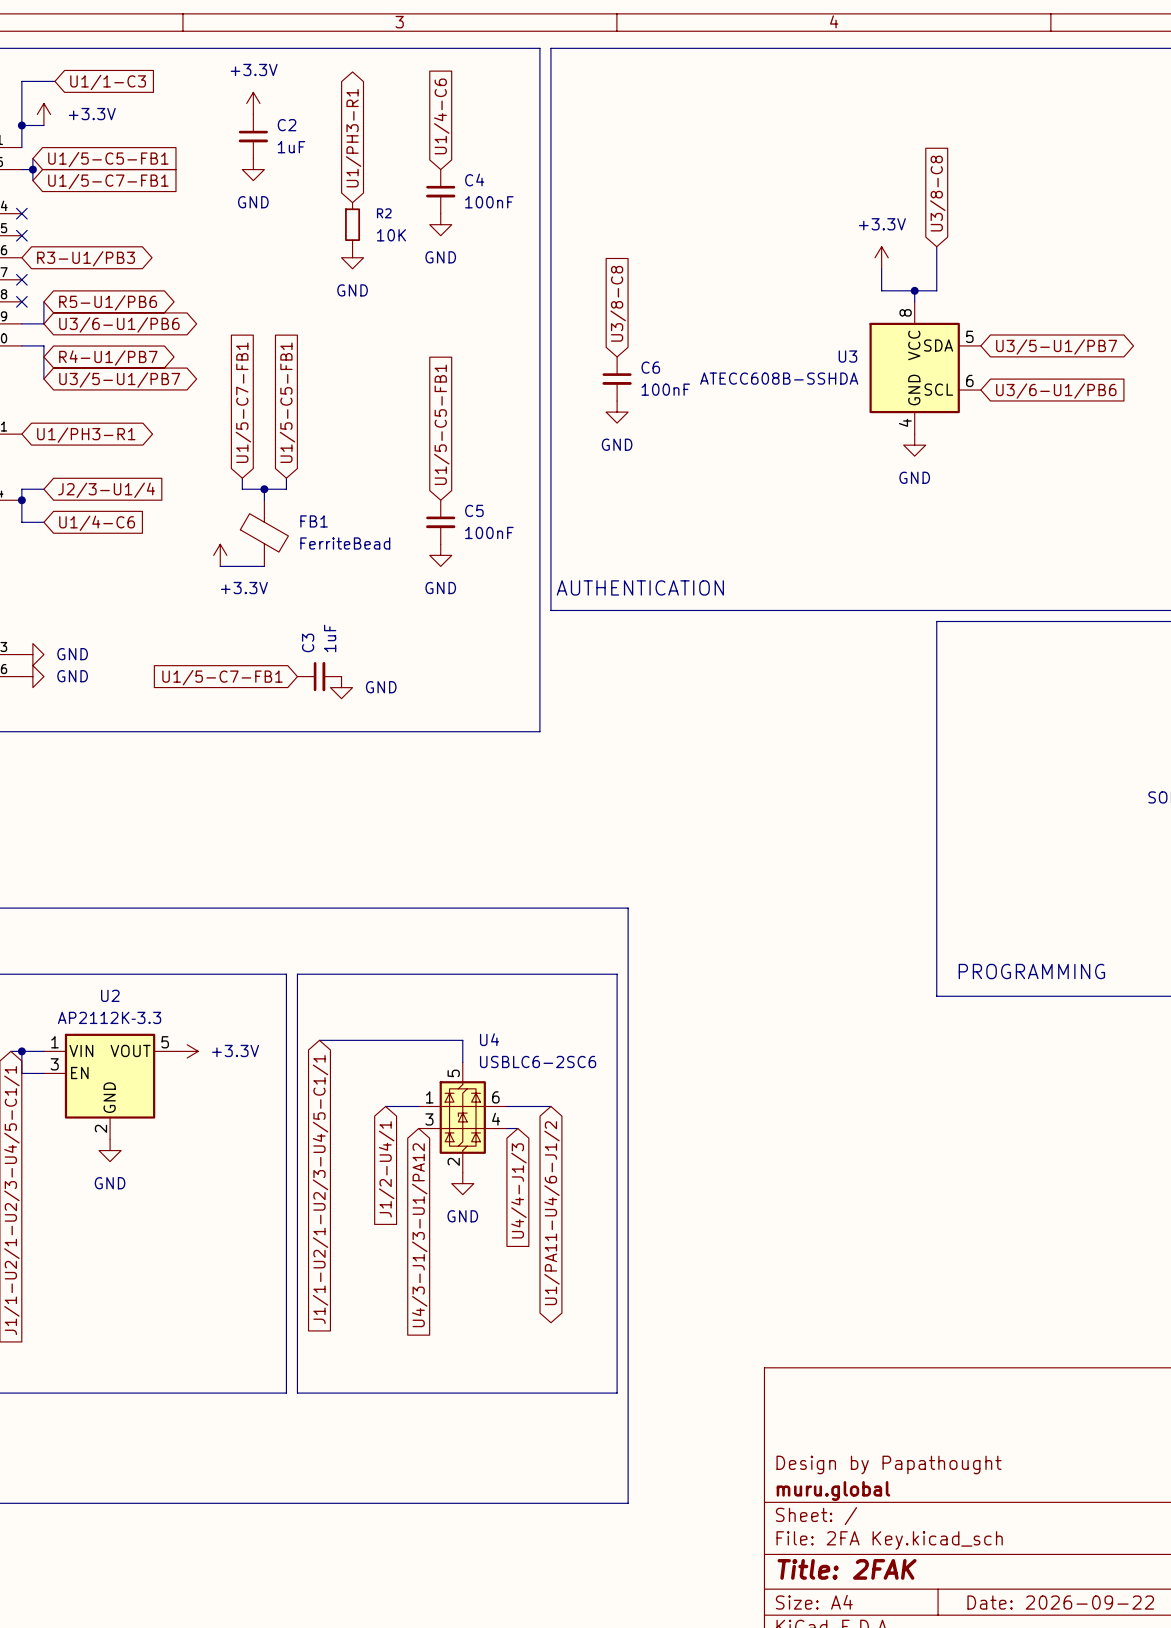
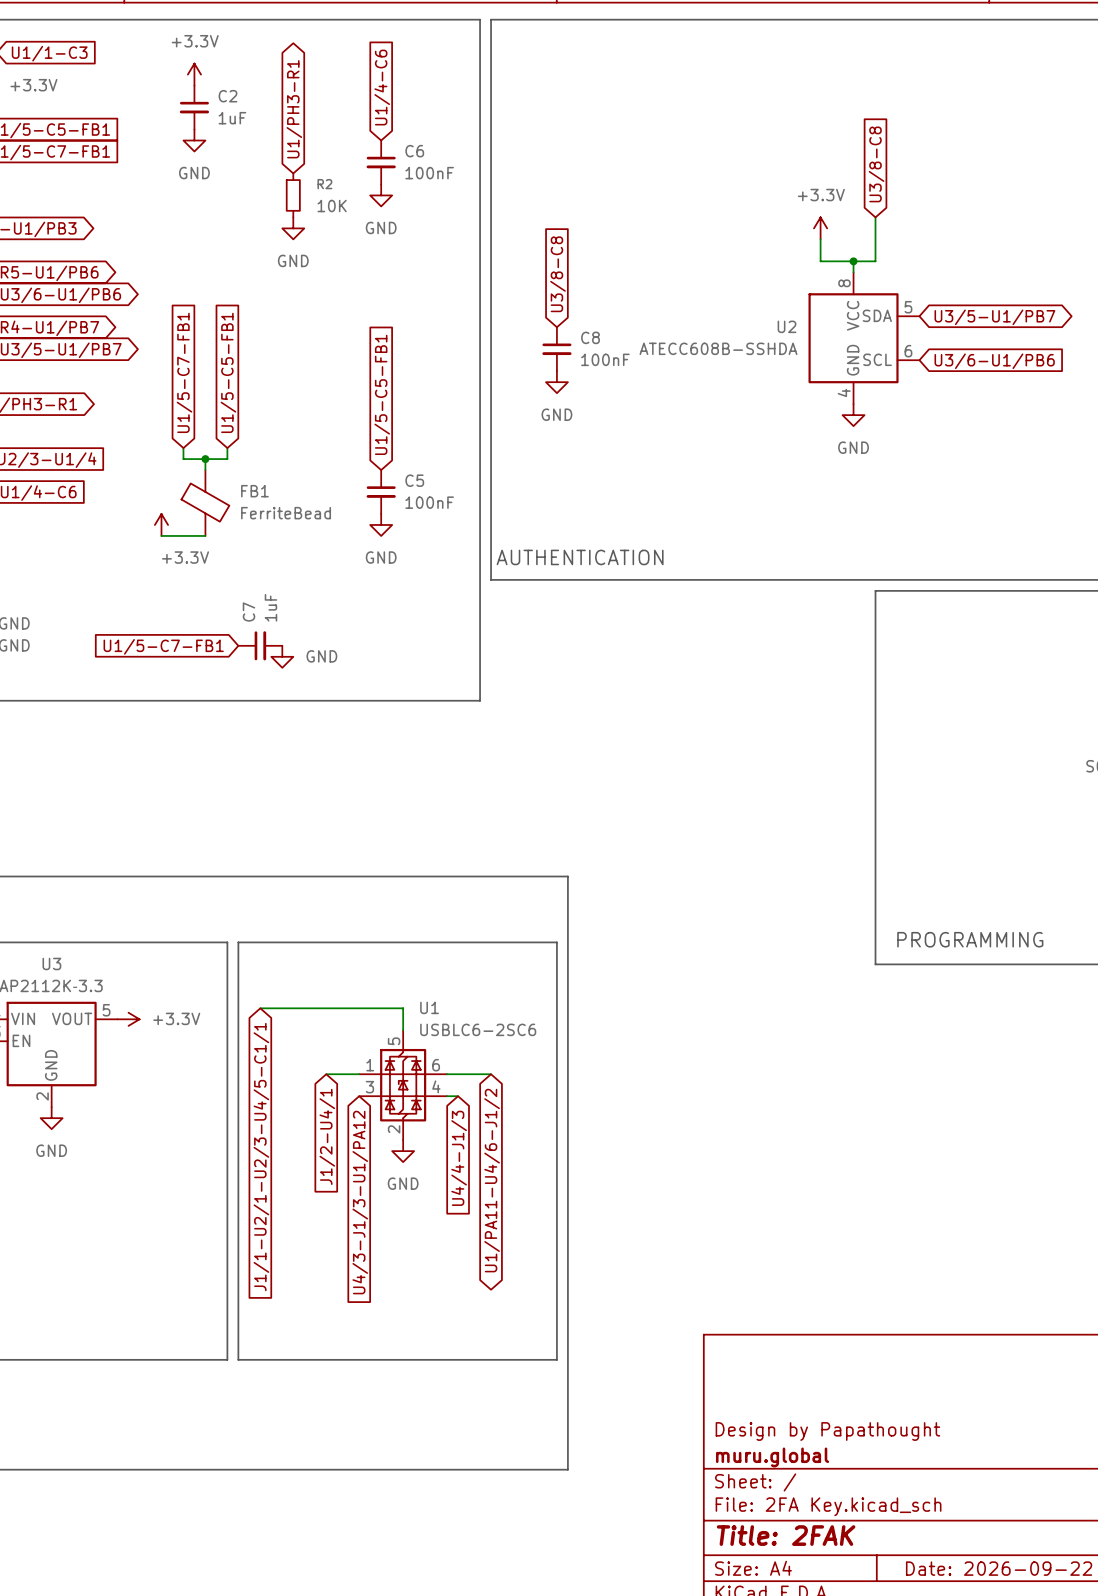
C4 name: C4 (474, 179) -> C6 (414, 151)
U3 name: U3 (847, 356) -> U2 (787, 326)
C6 name: C6 (650, 367) -> C8 (590, 337)
C3 name: C3 (308, 642) -> C7 (249, 612)
U2 name: U2 (110, 995) -> U3 (51, 963)
U4 name: U4 (489, 1039) -> U1 (429, 1007)

